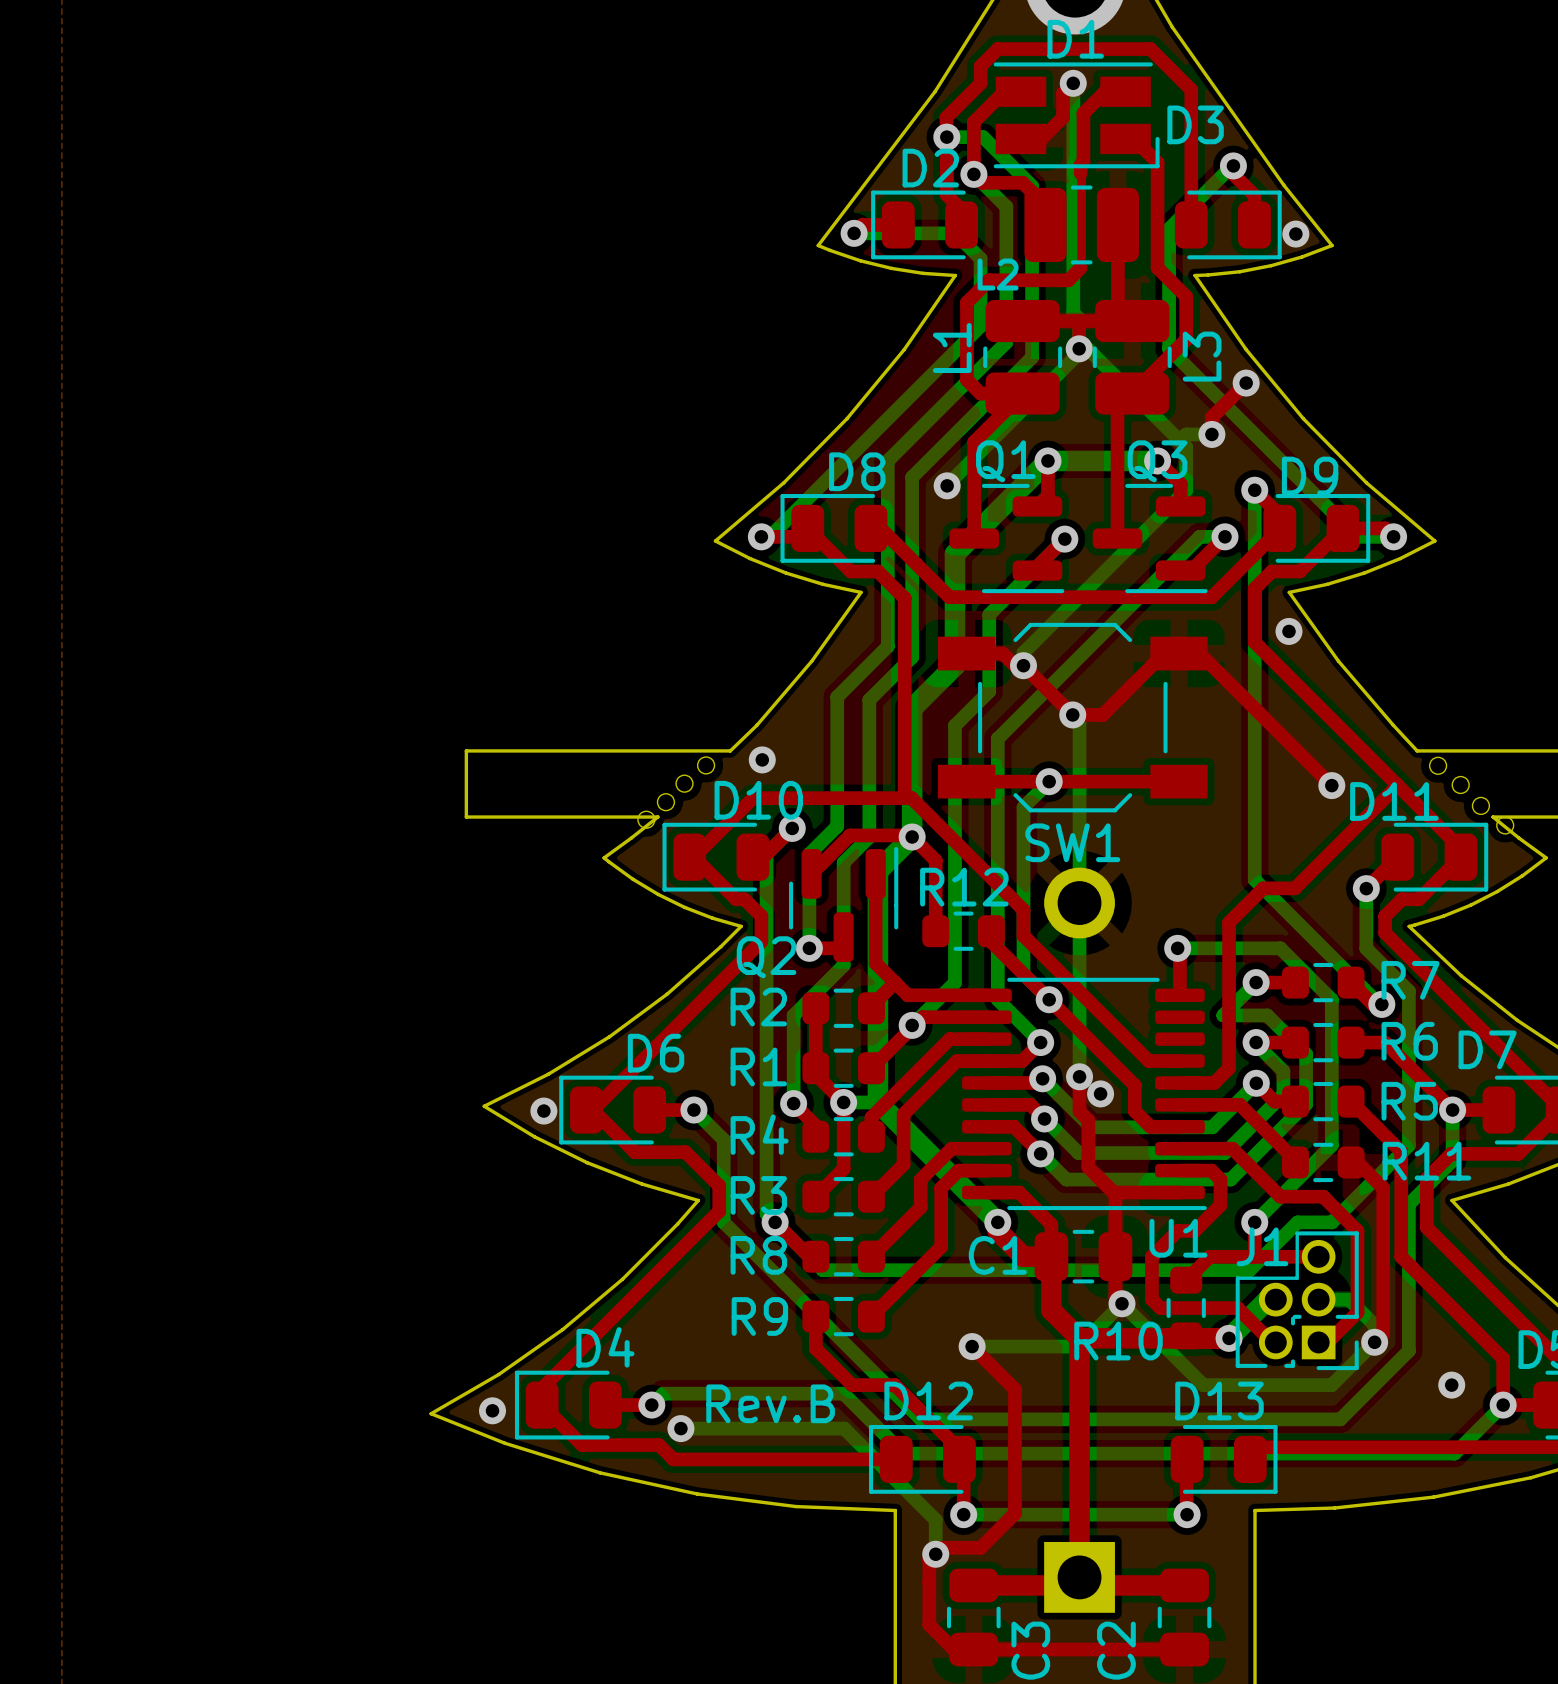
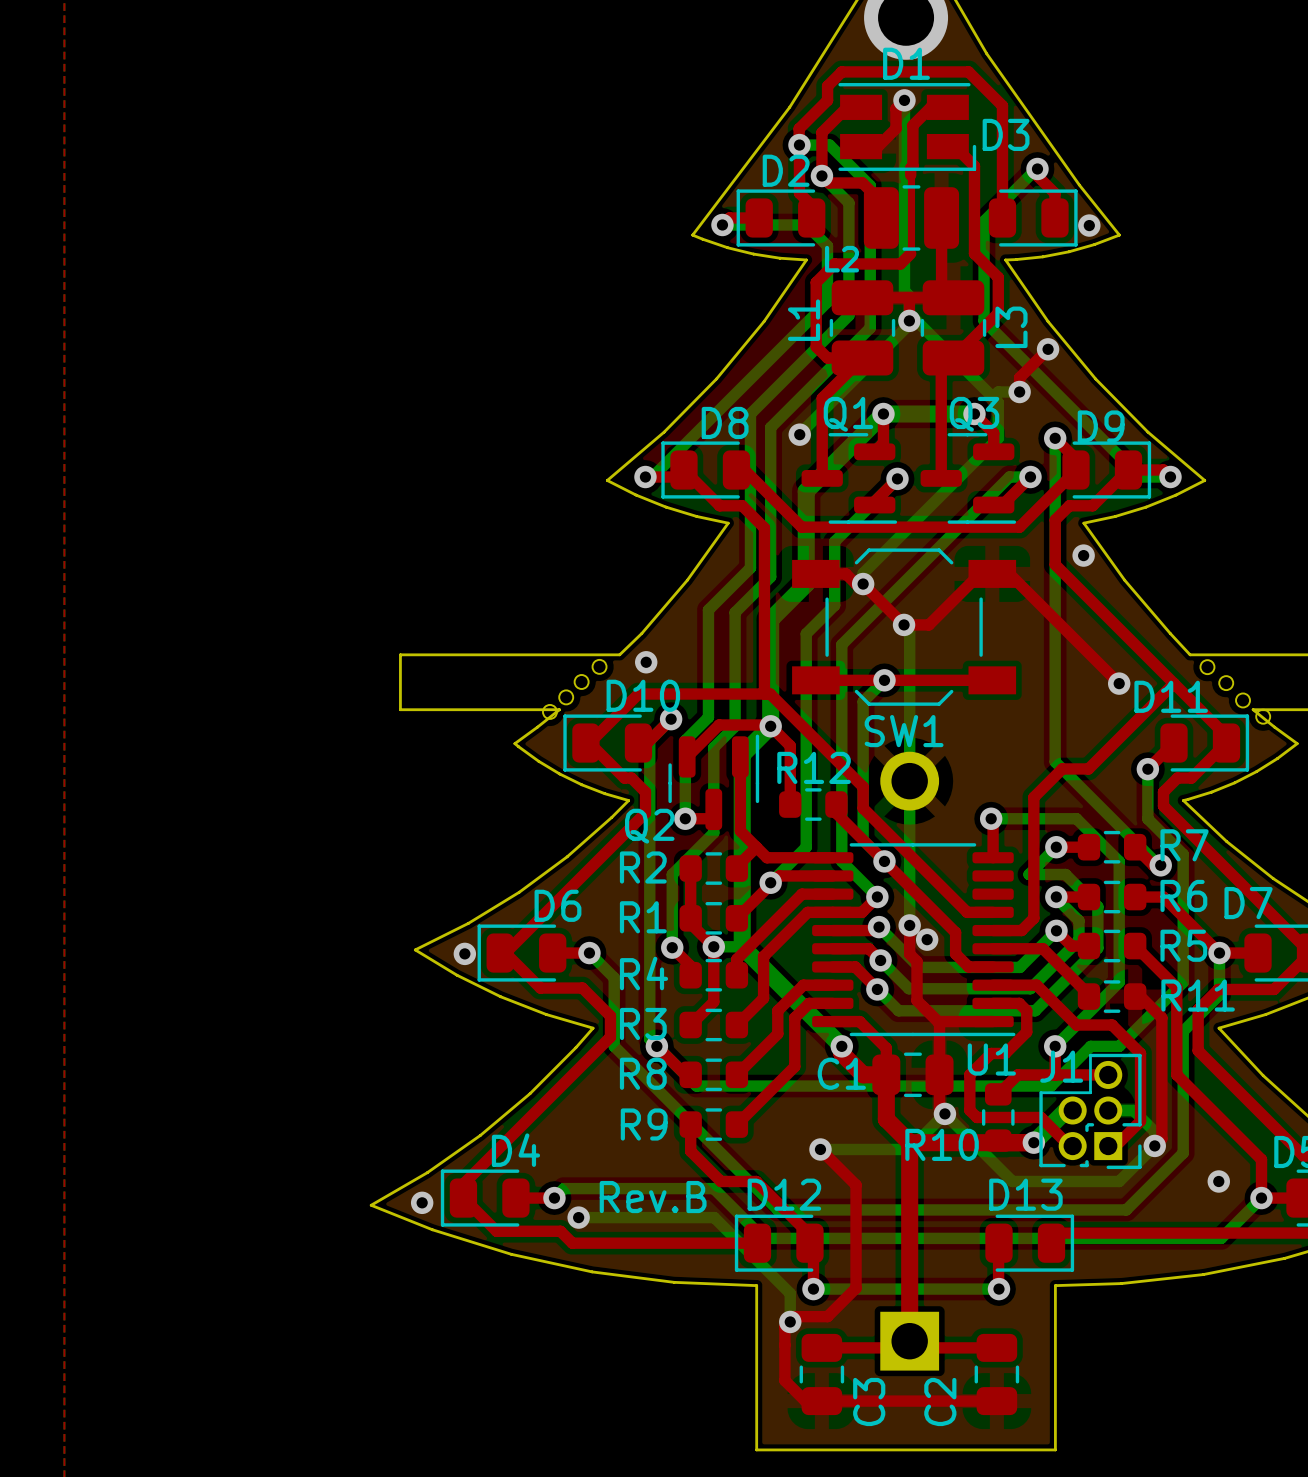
top track width: thick (973, 1585) (1071, 1585) -> thin (821, 1347) (902, 1347)
top track width: thick (1087, 1585) (1184, 1585) -> thin (916, 1347) (996, 1347)

